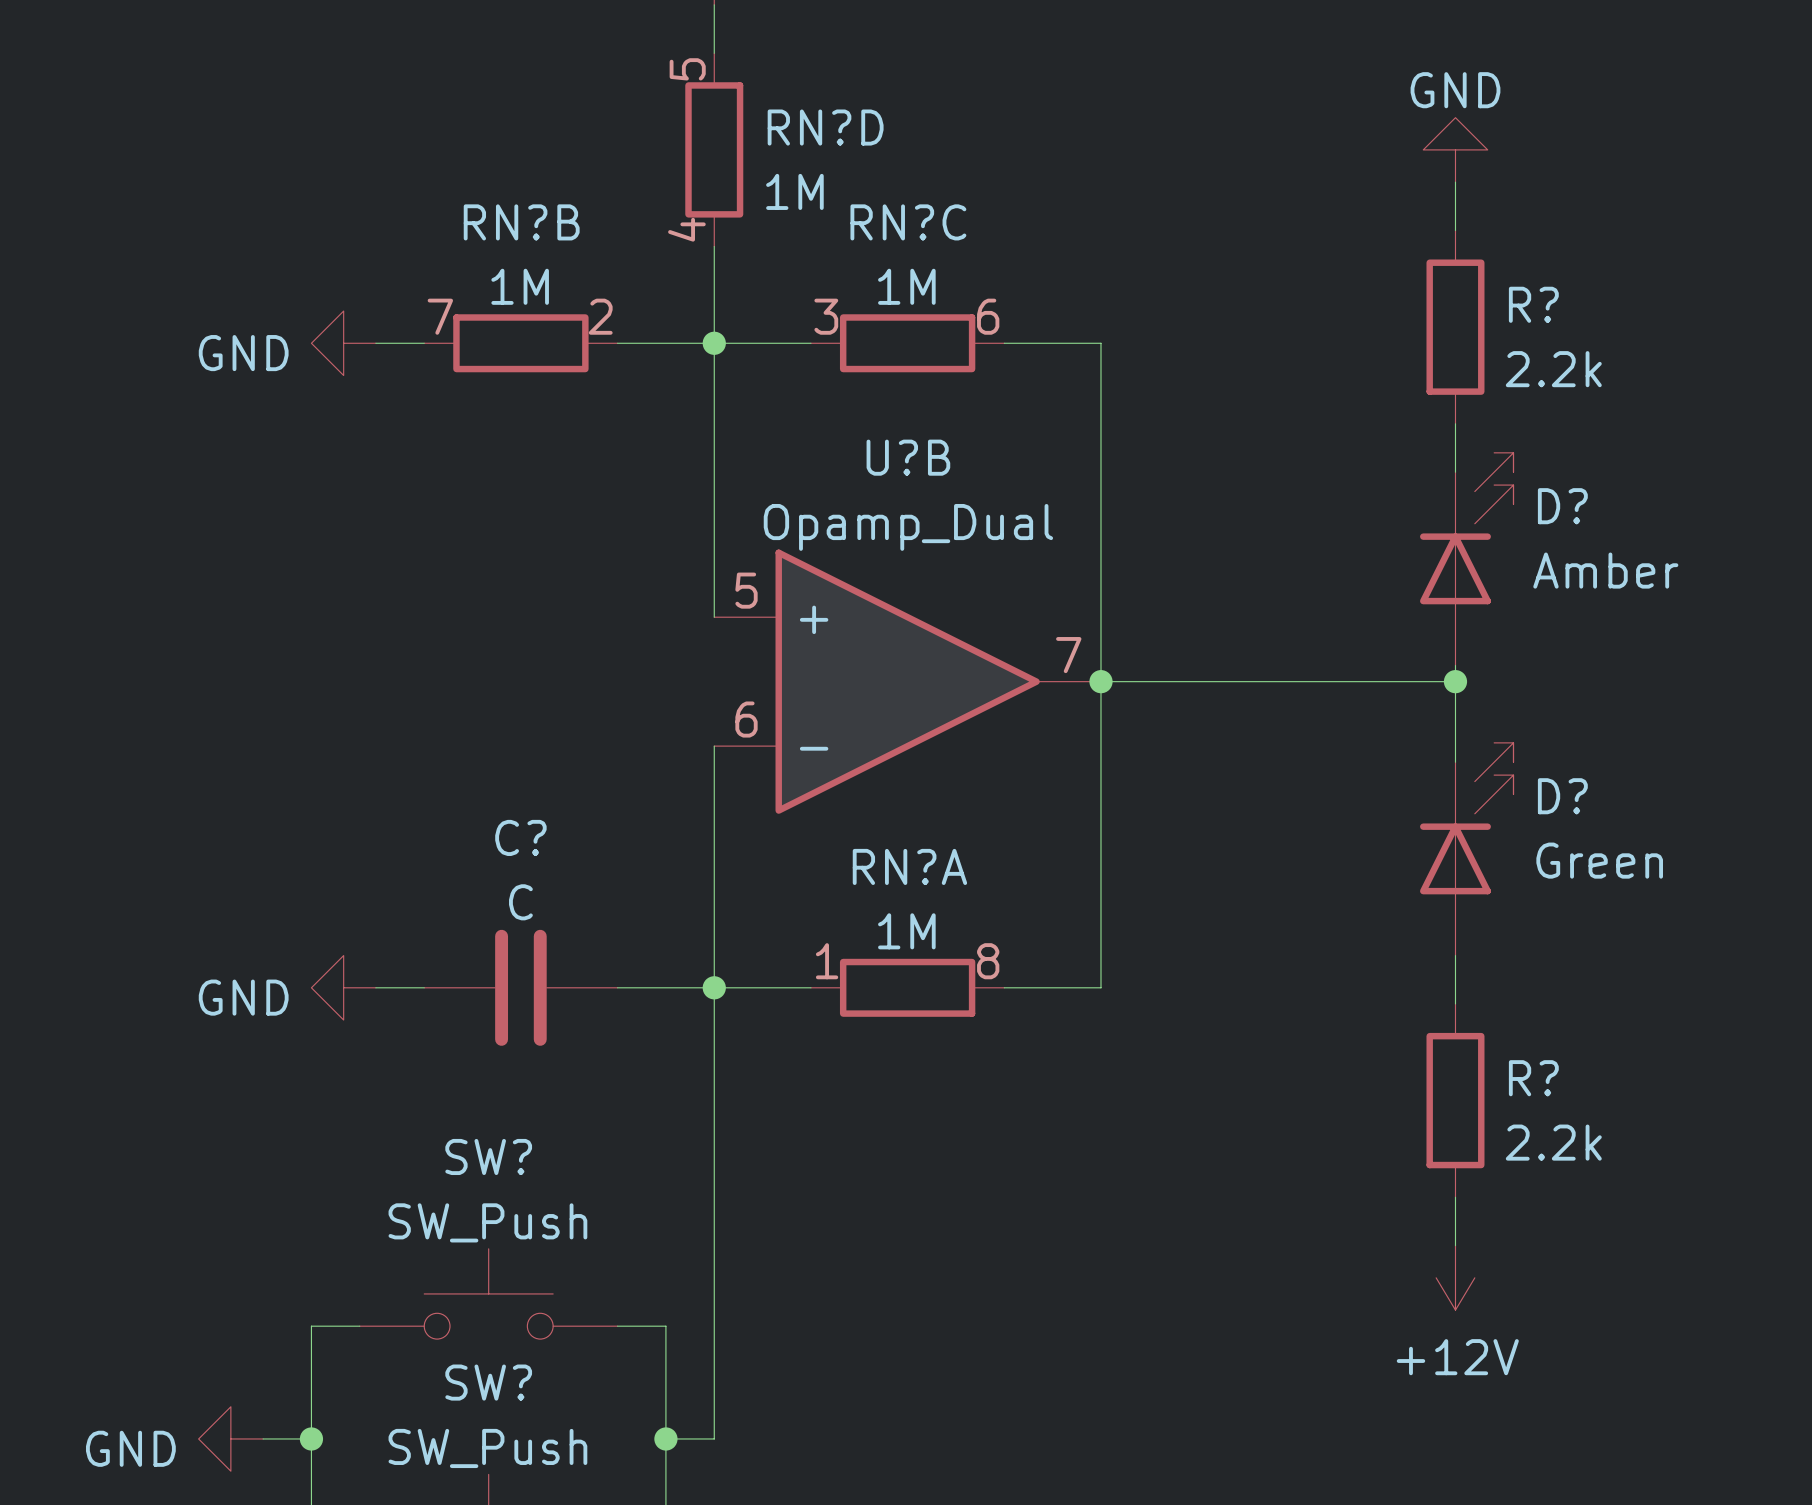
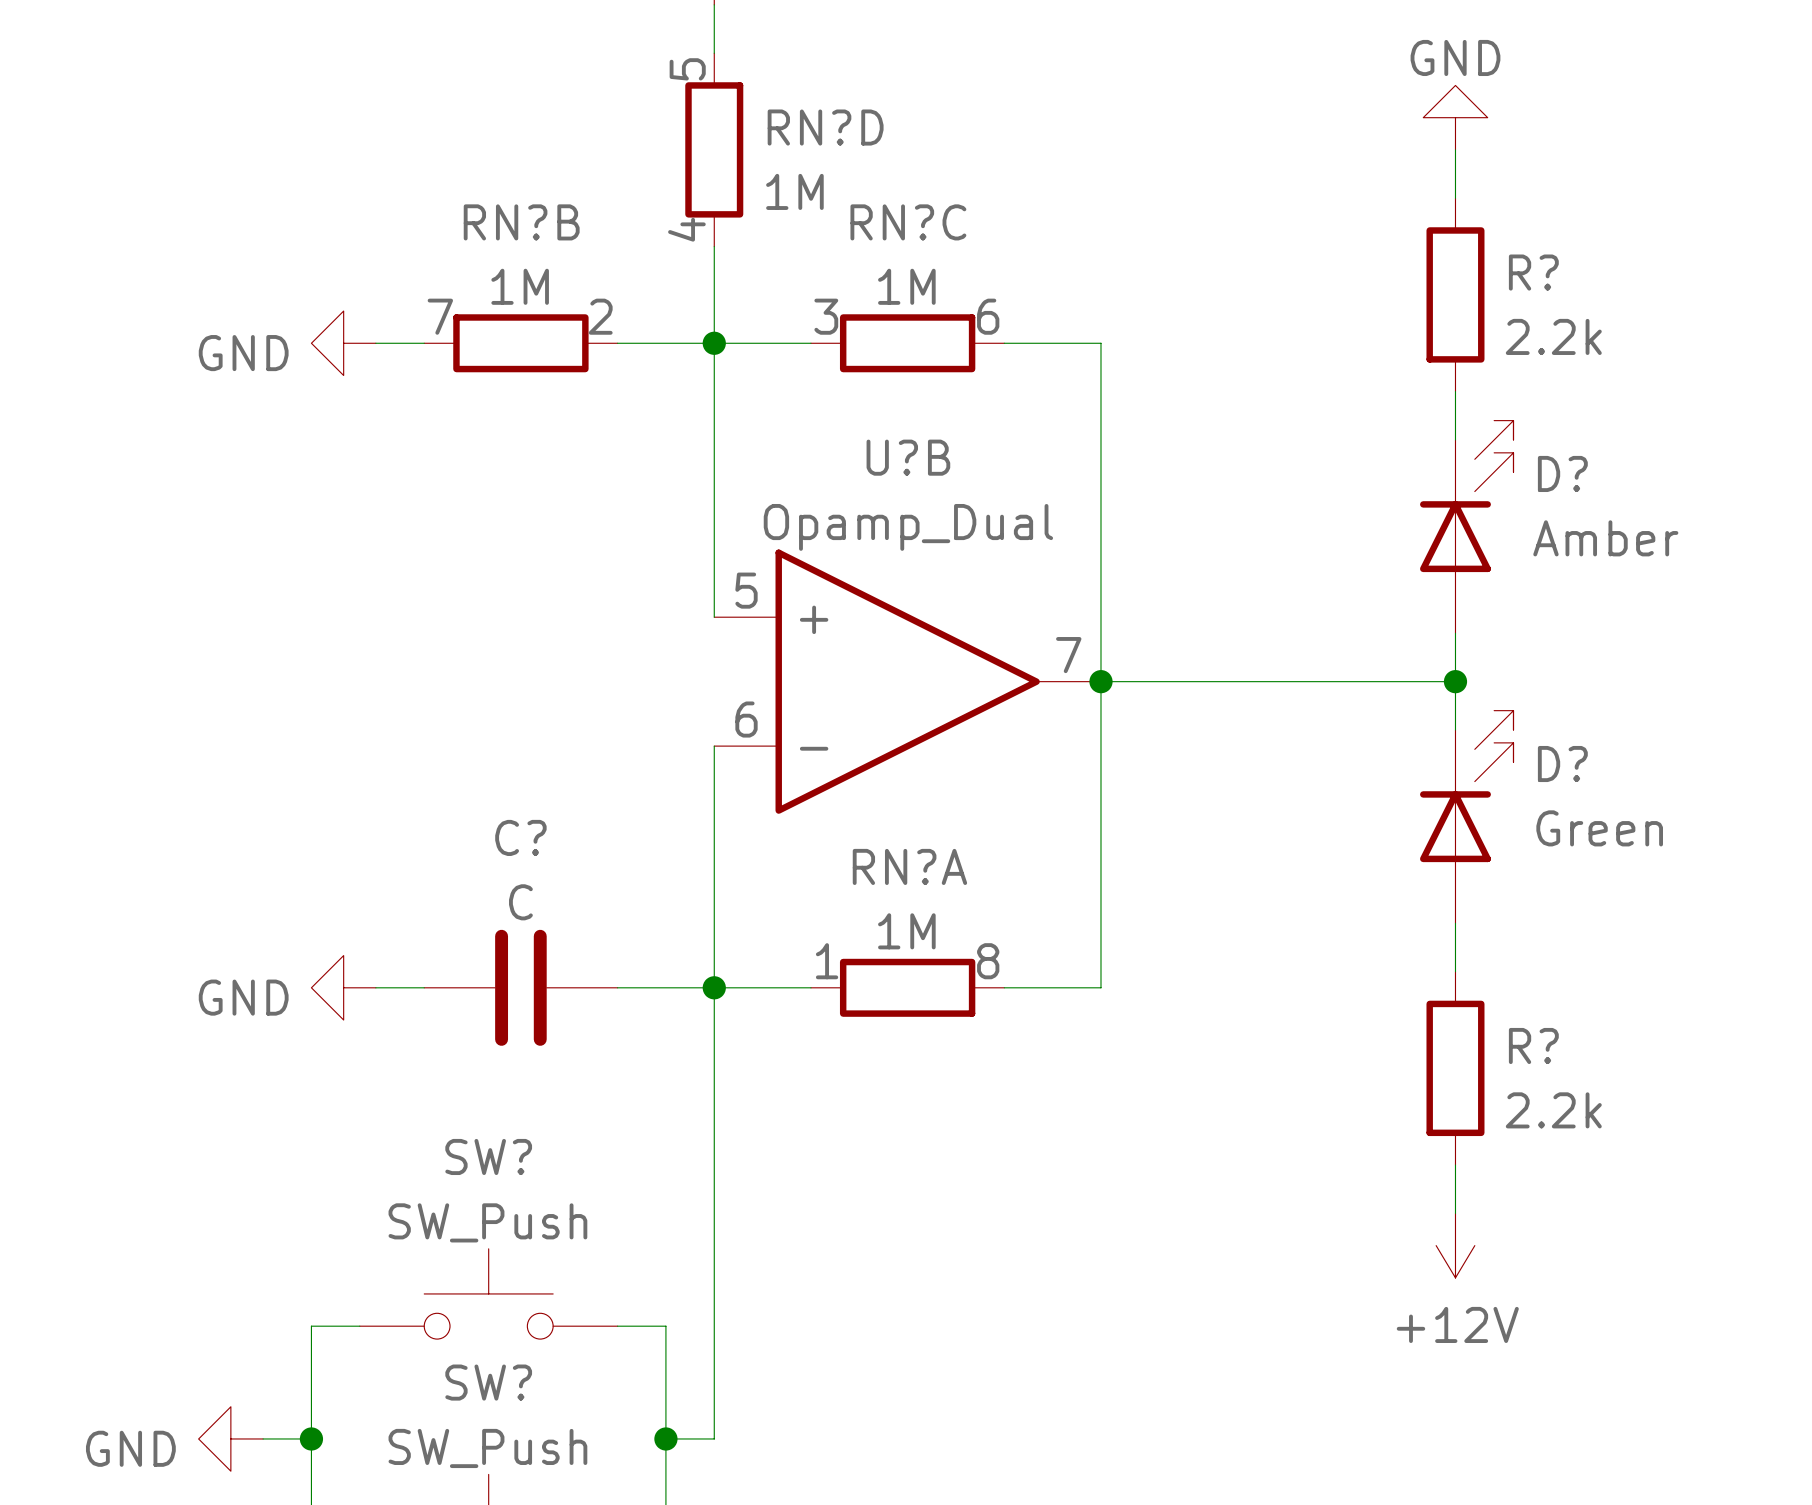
power symbol position: GND (1455, 149) -> GND (1455, 117)
R? position: (1455, 327) -> (1455, 294)
D? position: (1466, 559) -> (1466, 526)
D? position: (1466, 849) -> (1466, 817)
R? position: (1455, 1100) -> (1455, 1068)
power symbol position: +12V (1455, 1277) -> +12V (1455, 1245)

